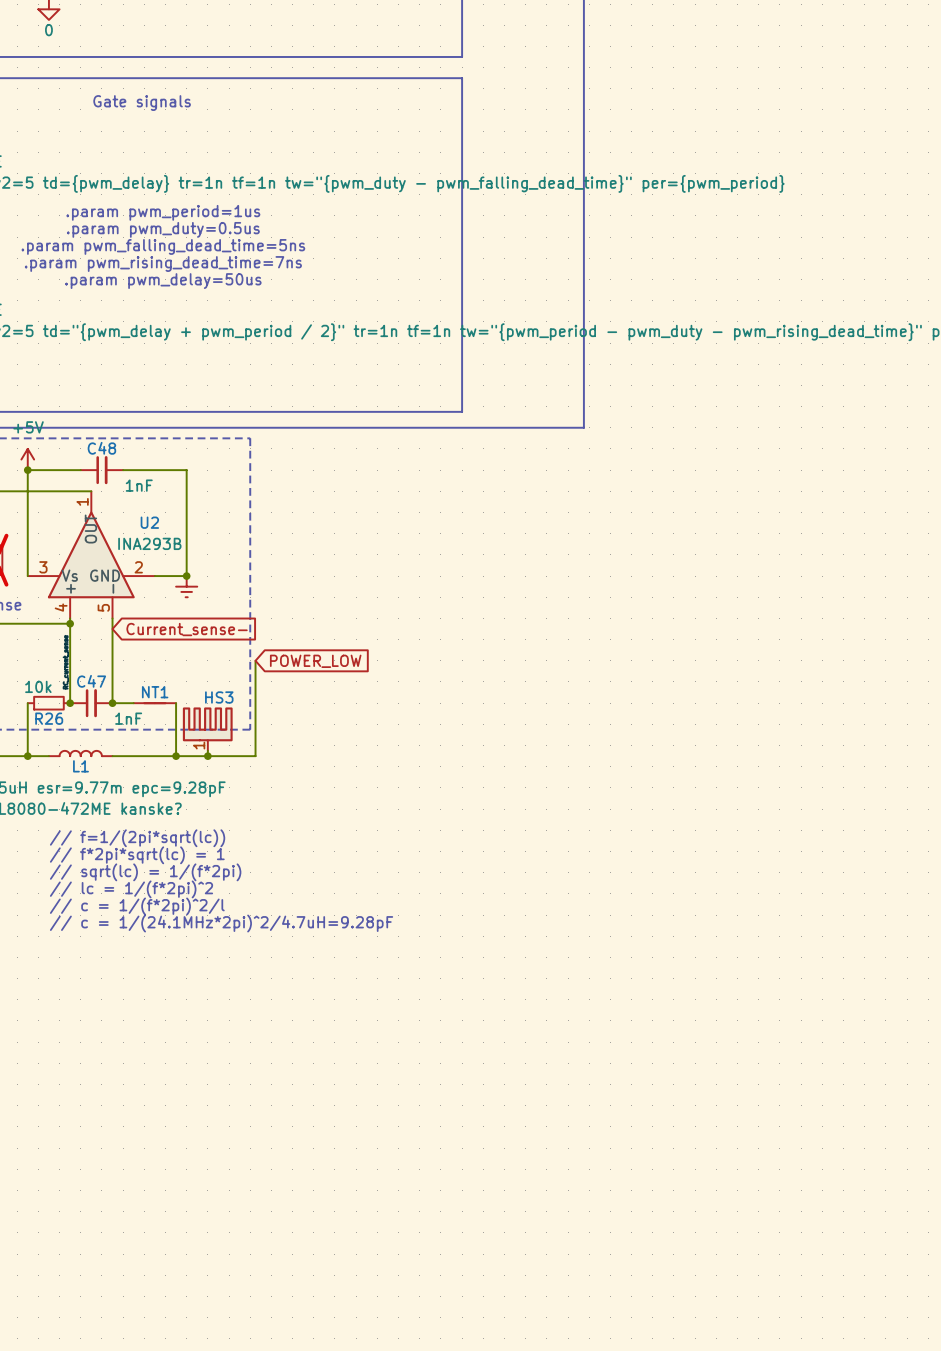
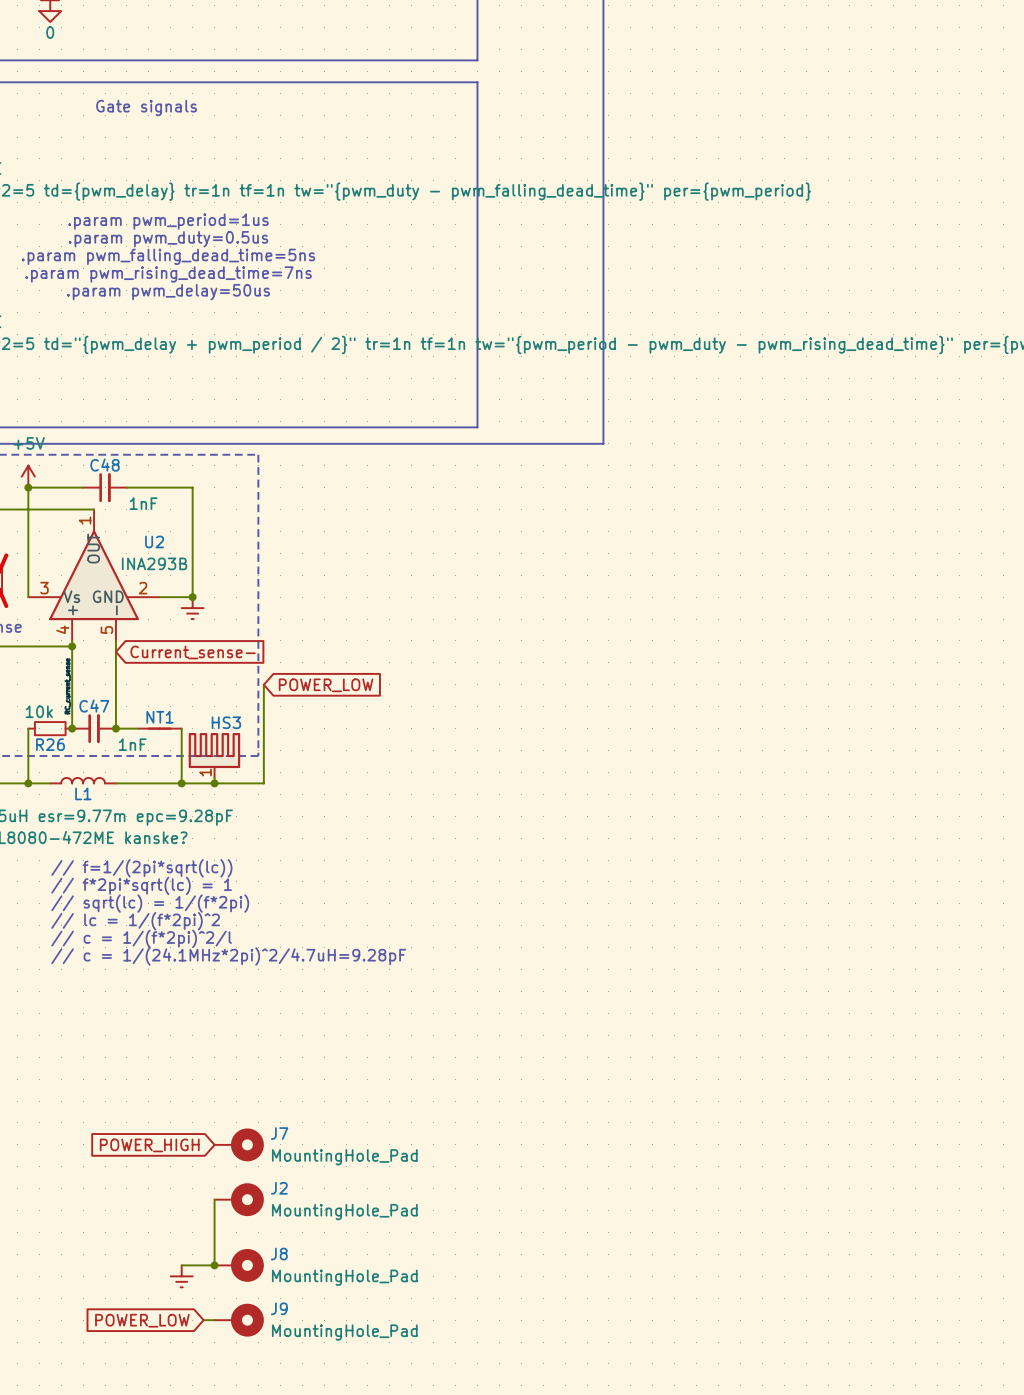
J7: none -> MountingHole_Pad (239, 1144)
global label: none -> POWER_HIGH (149, 1145)
wire: none -> (214, 1199) (214, 1265) (181, 1265)
J2: none -> MountingHole_Pad (239, 1199)
junction: none -> (214, 1265)
J8: none -> MountingHole_Pad (239, 1265)
power symbol: none -> (181, 1276)
global label: none -> POWER_LOW (142, 1320)
wire: none -> (203, 1320) (214, 1320)
J9: none -> MountingHole_Pad (239, 1320)

